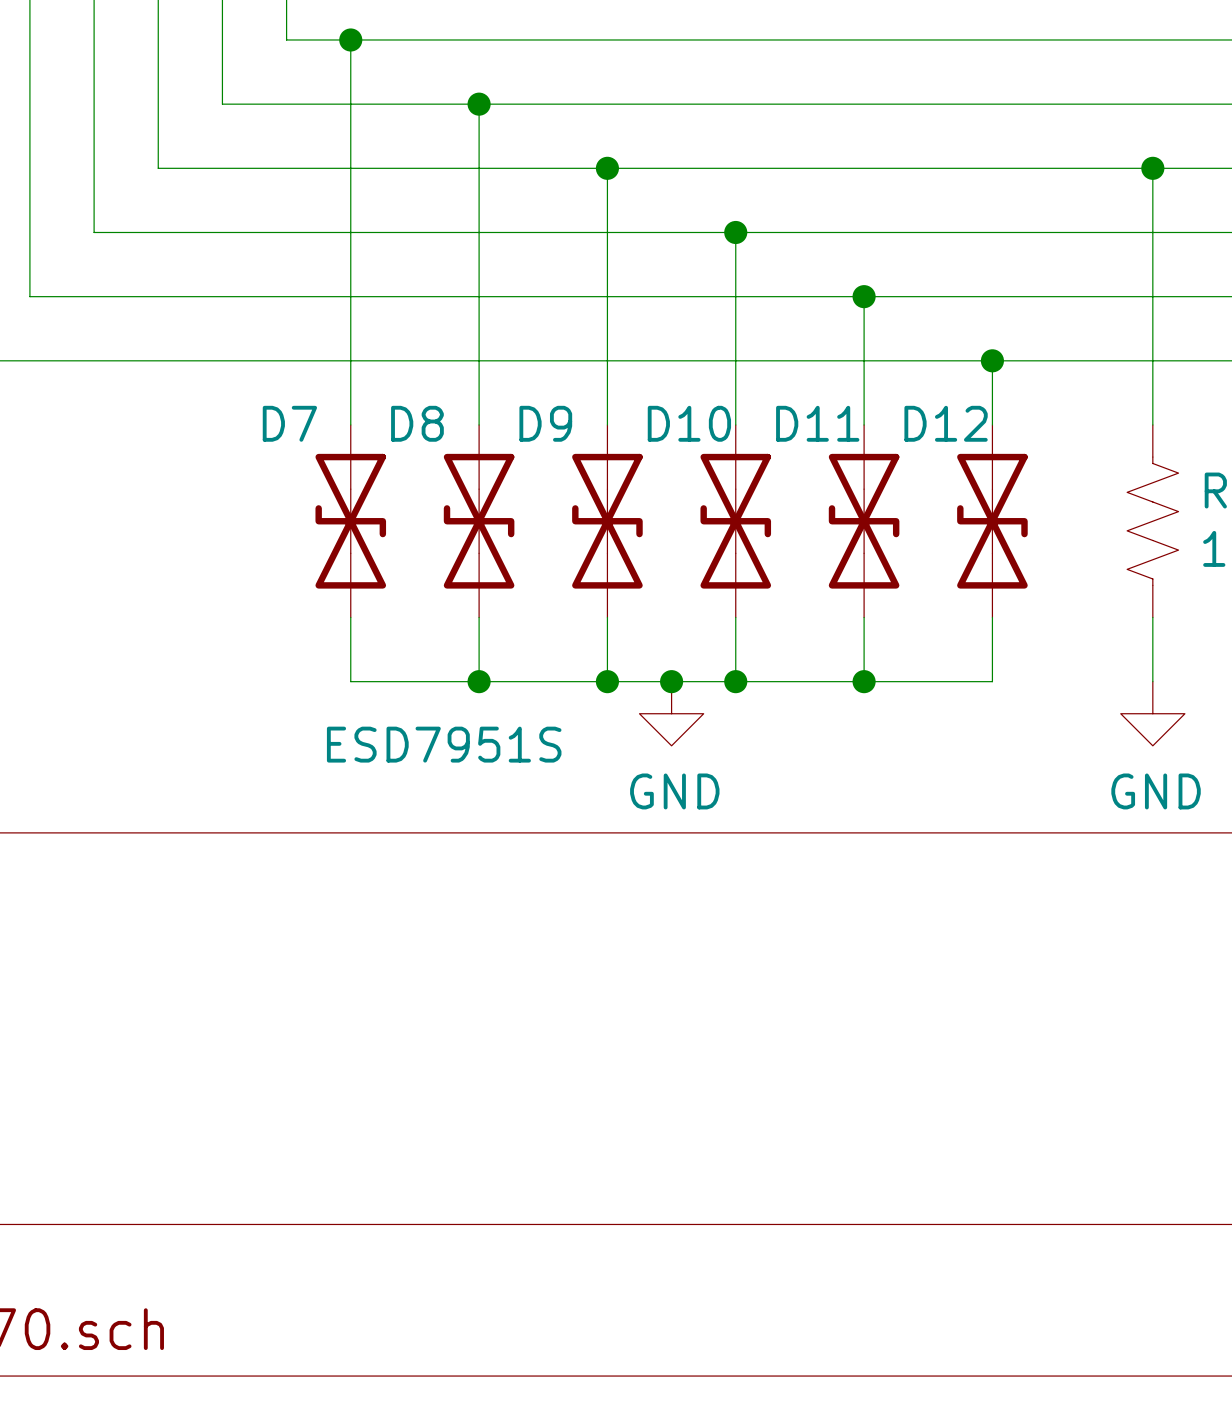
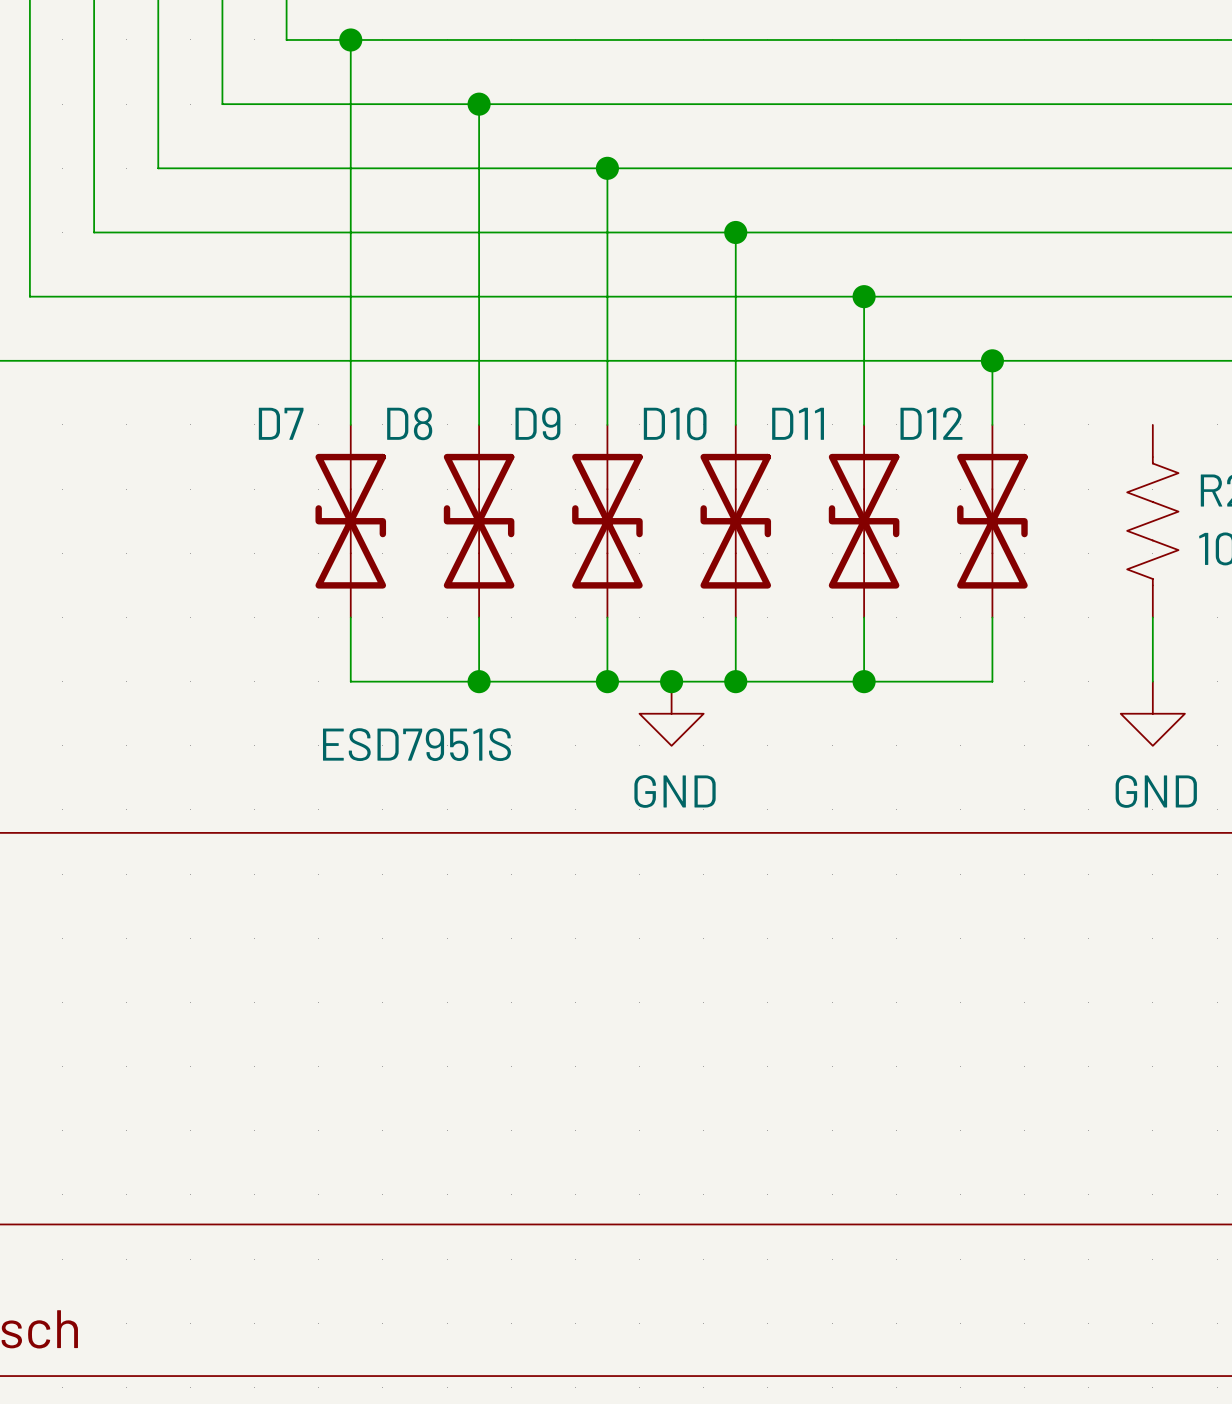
wire: (1152, 168) (1152, 424) -> none
junction: (1152, 168) -> none

